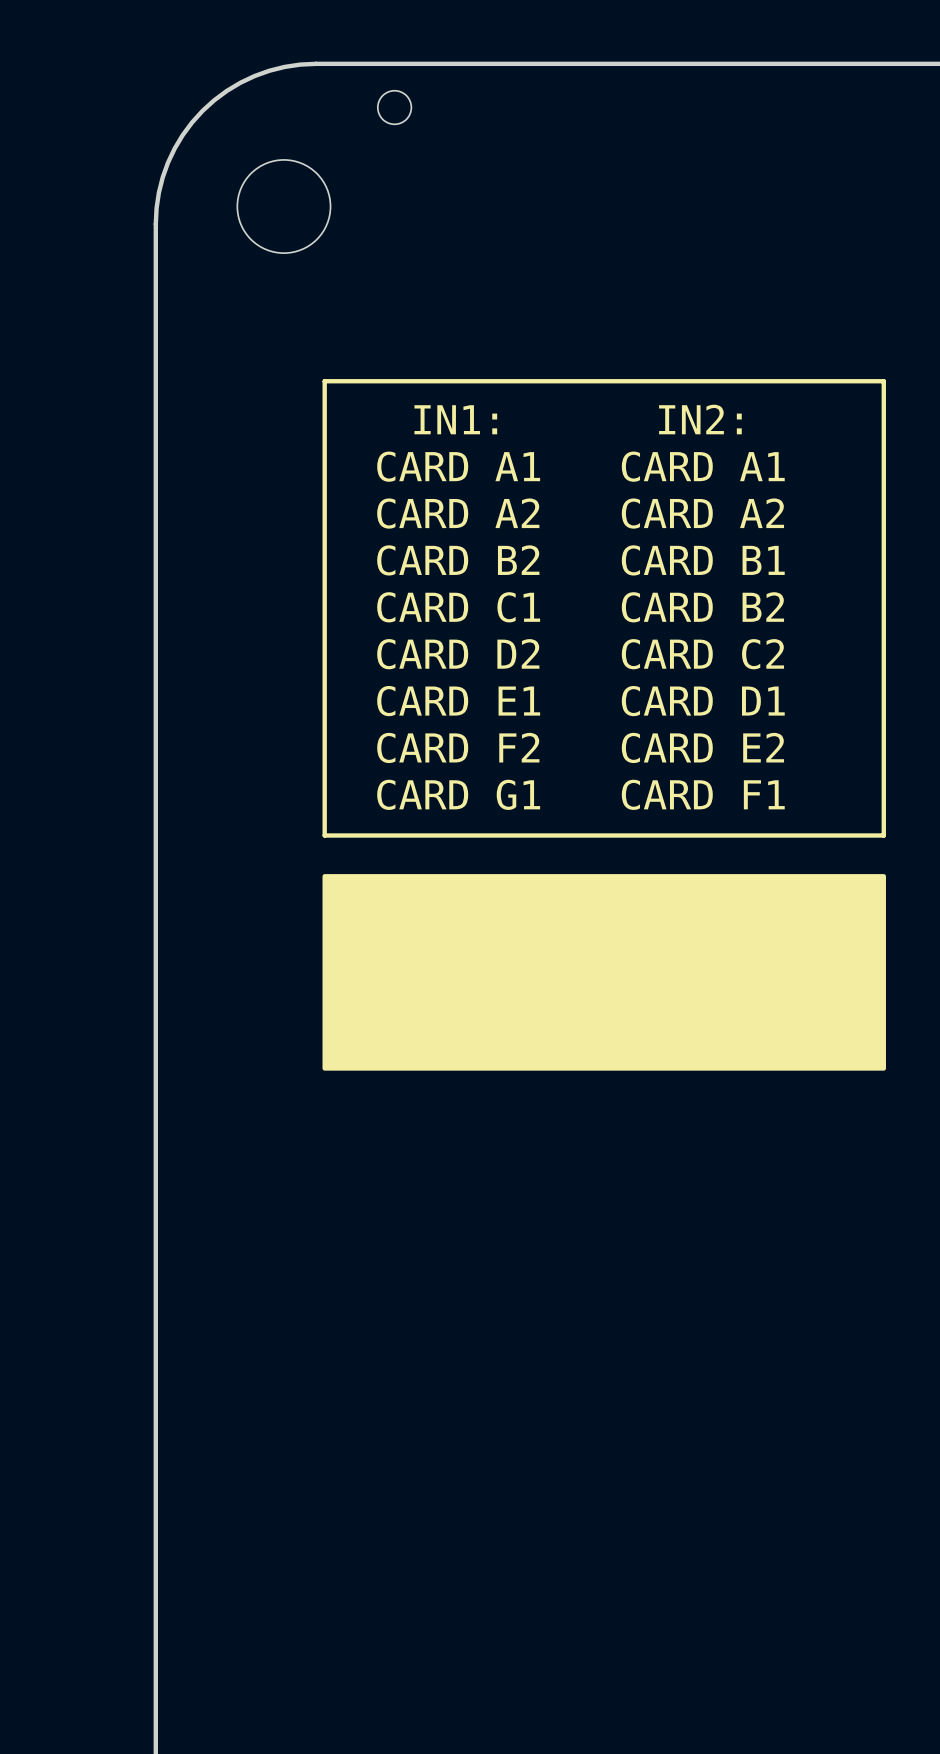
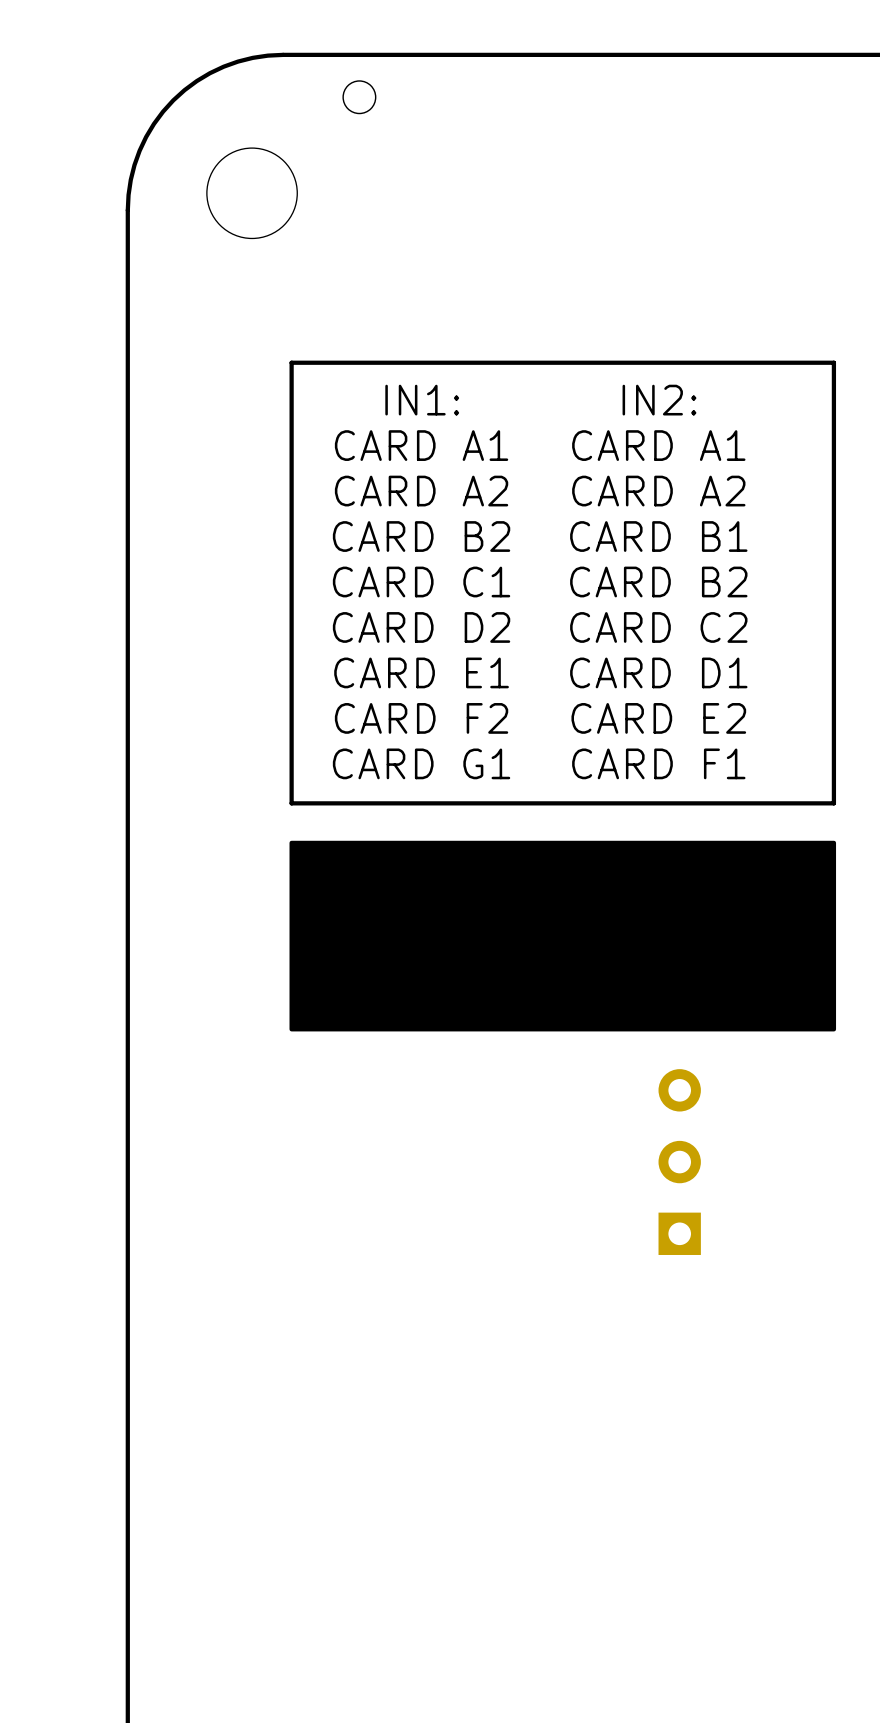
part: none -> (679, 1162)

